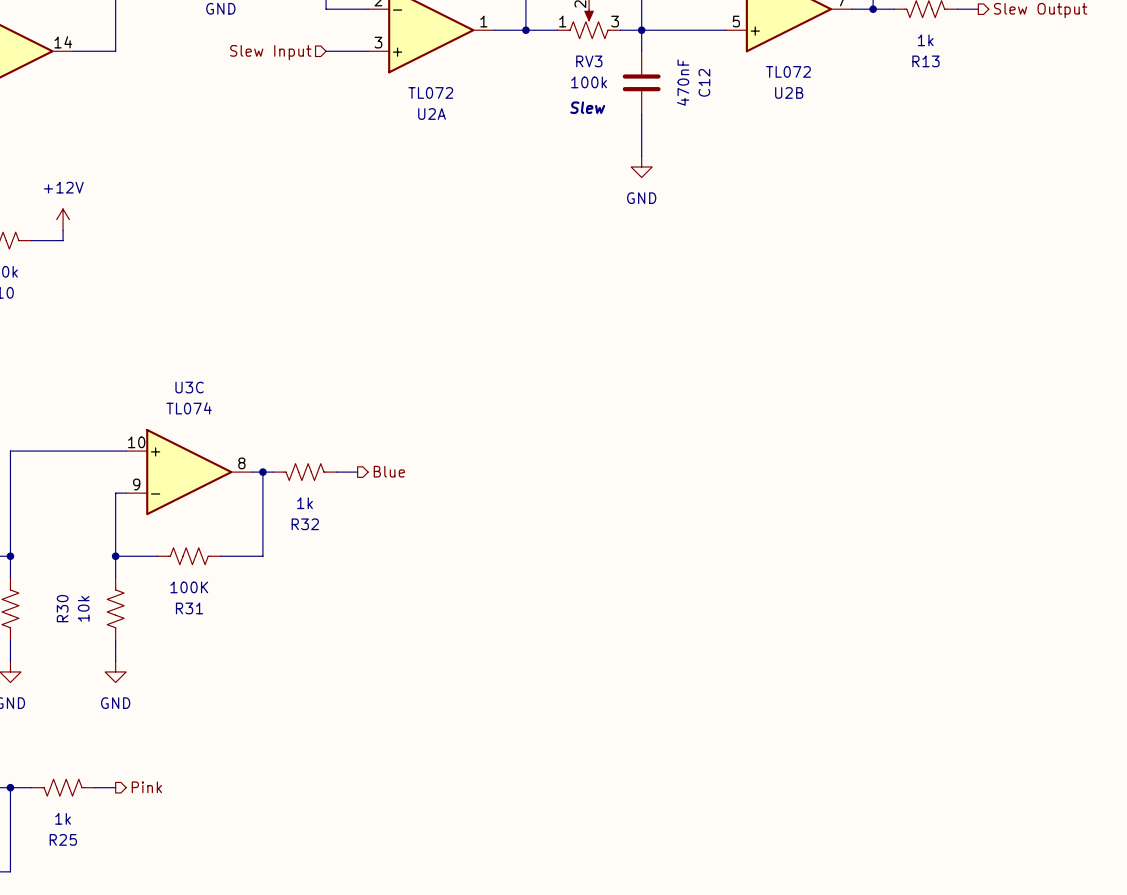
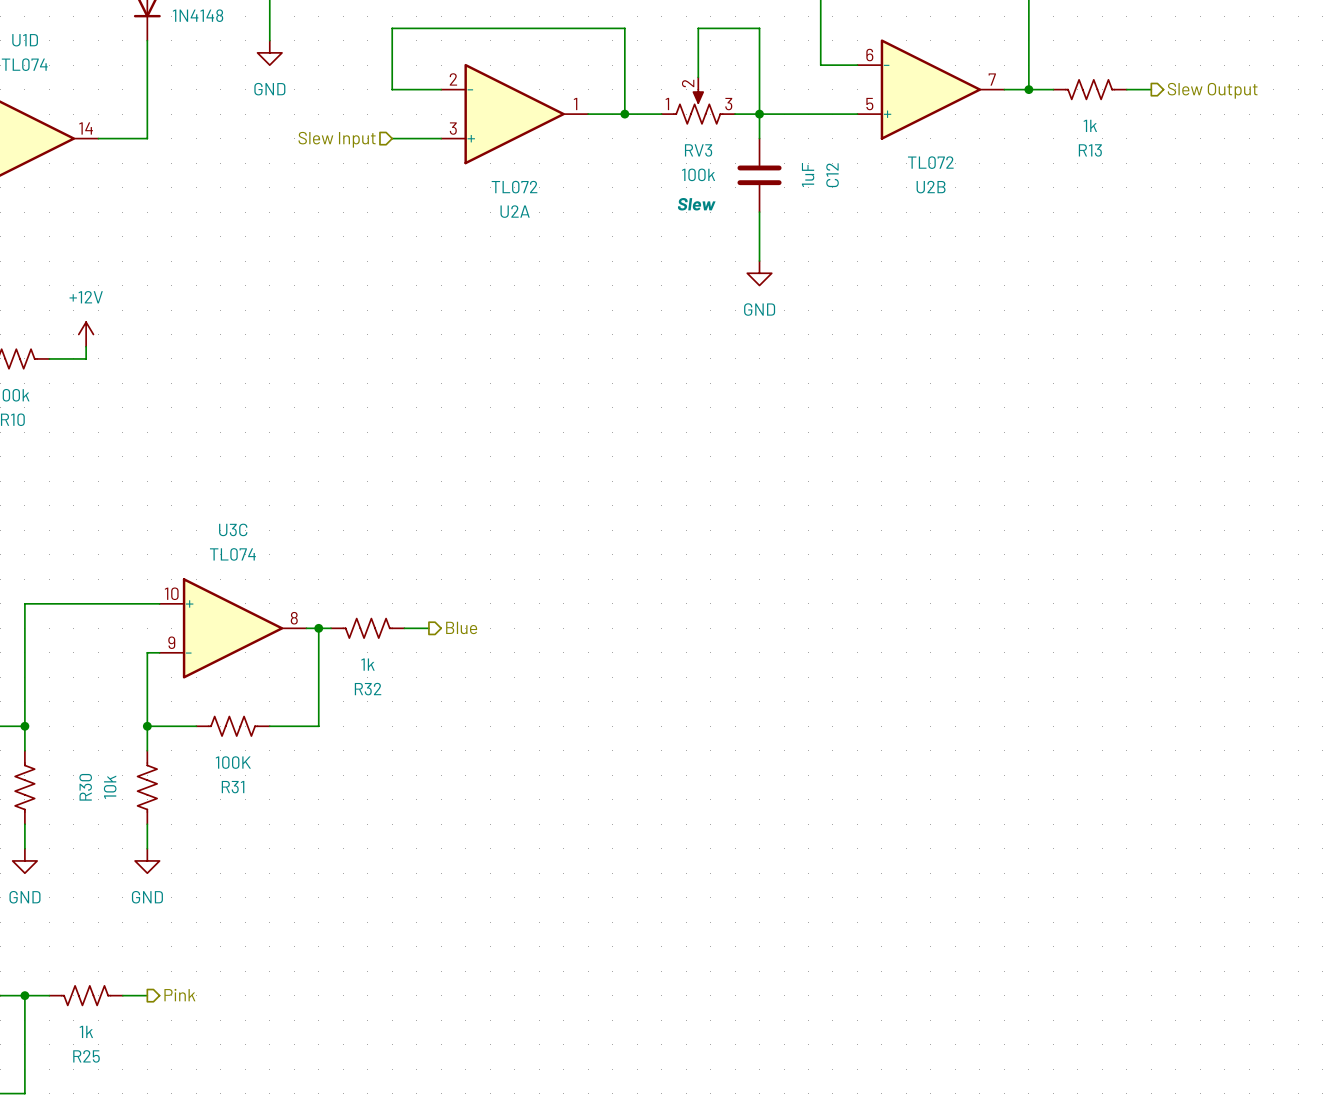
C12 value: 470nF (683, 82) -> 1uF (808, 175)

